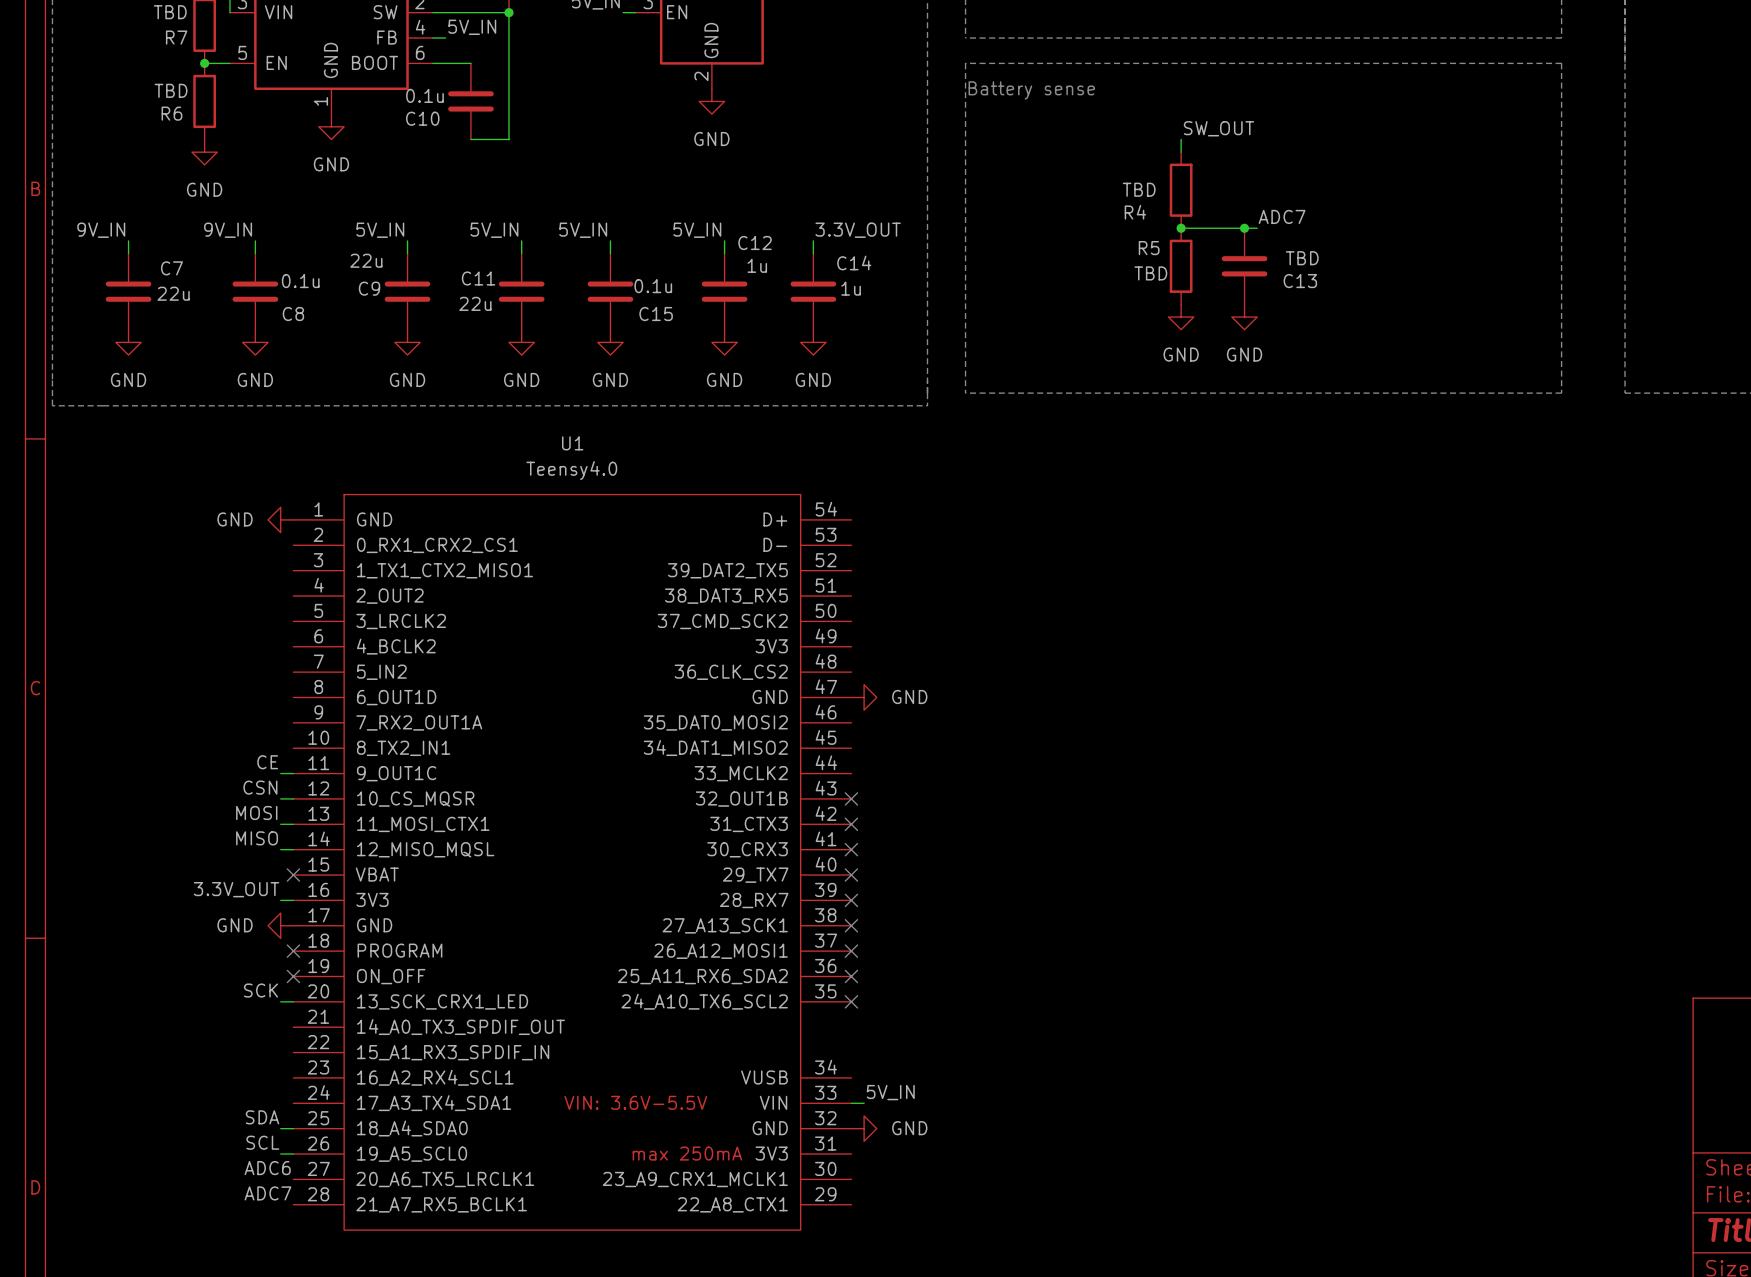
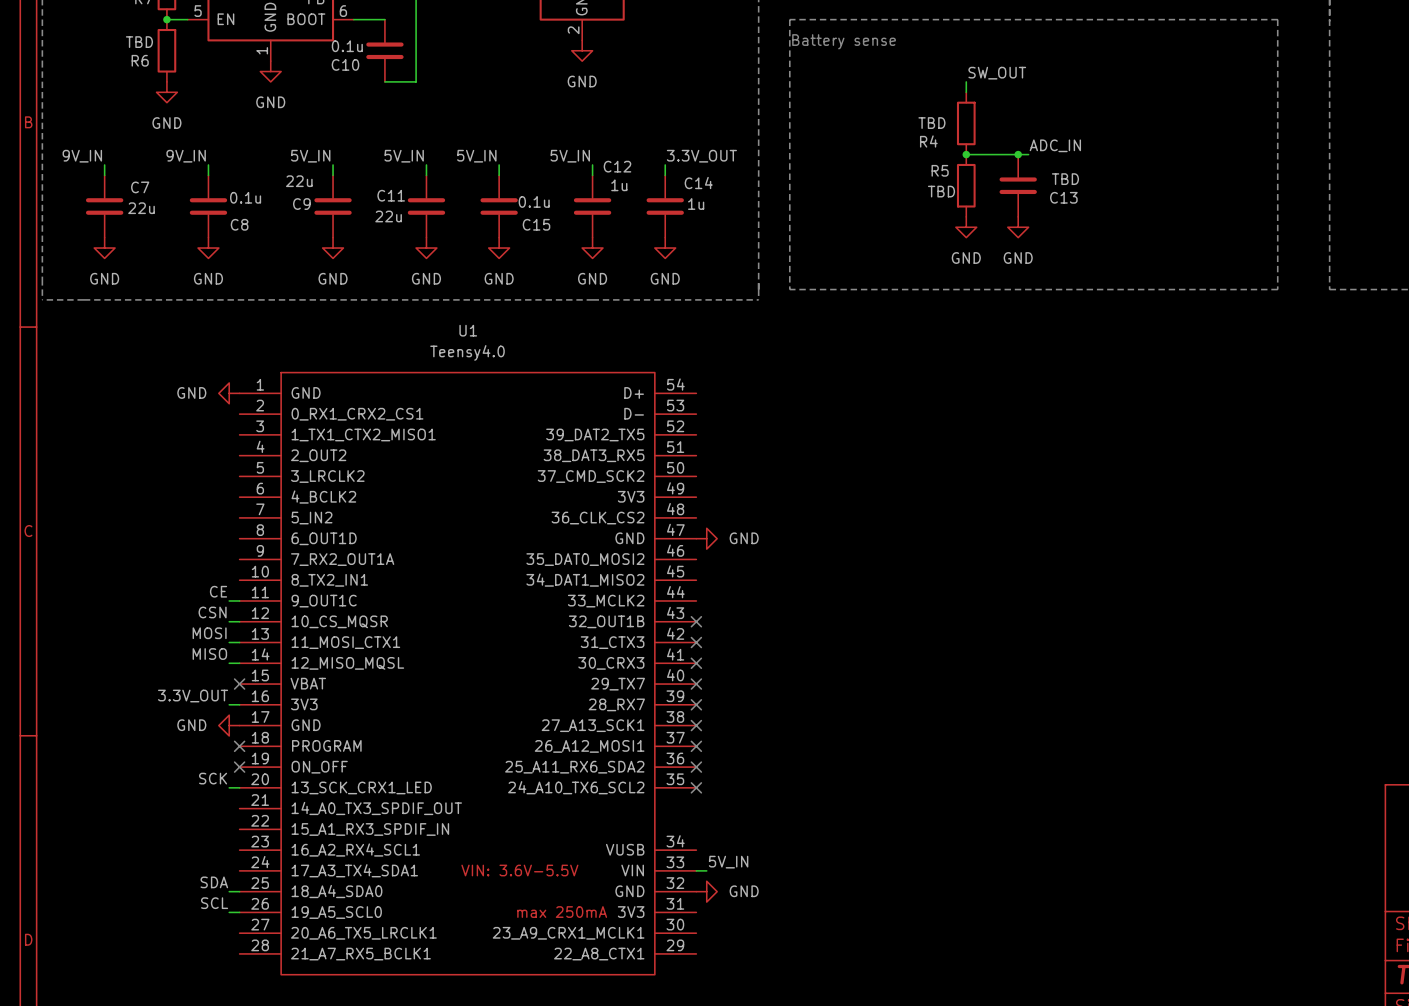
label: ADC7 (1282, 216) -> ADC_IN (1055, 145)
label: ADC6 (267, 1168) -> none
label: ADC7 (267, 1193) -> none

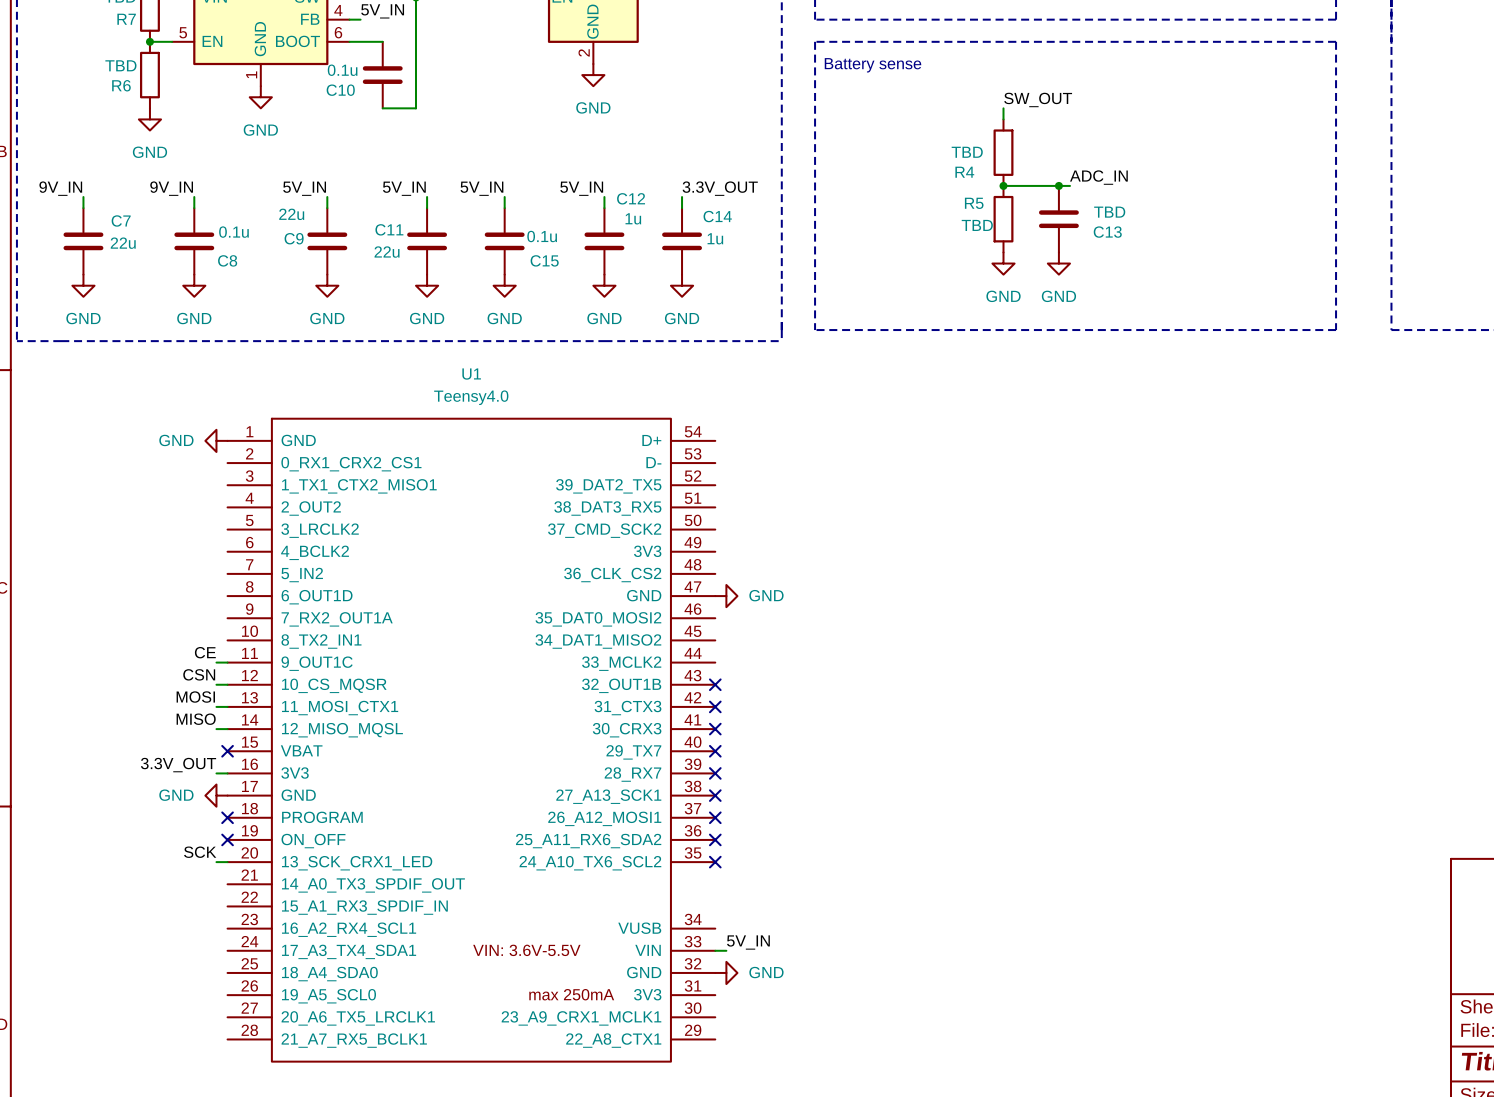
label: SDA (214, 882) -> none
wire: (229, 891) (239, 891) -> none
label: SCL (214, 903) -> none
wire: (229, 912) (239, 912) -> none

